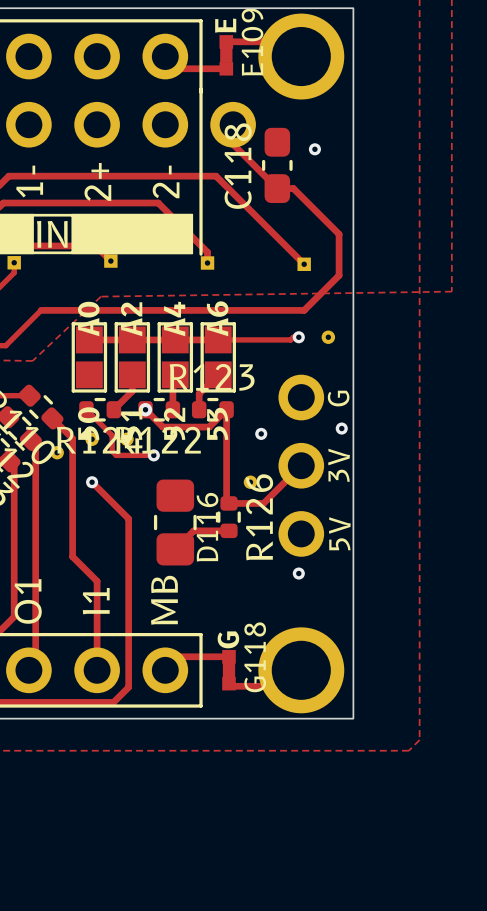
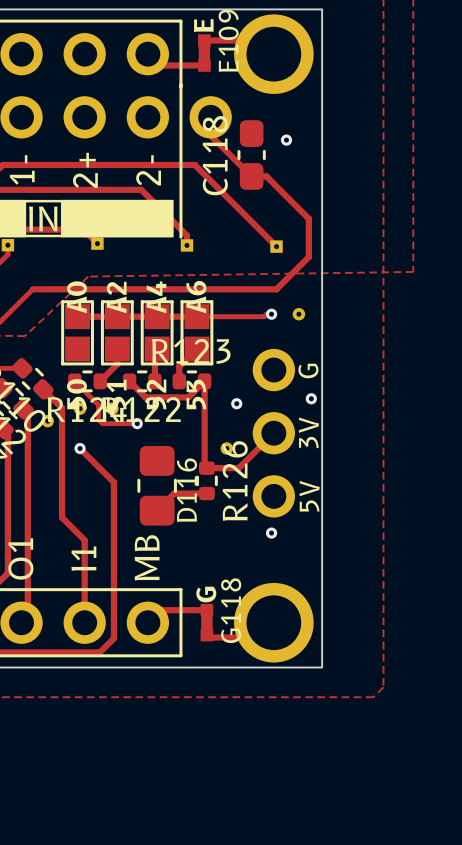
via: (145, 409) -> none

